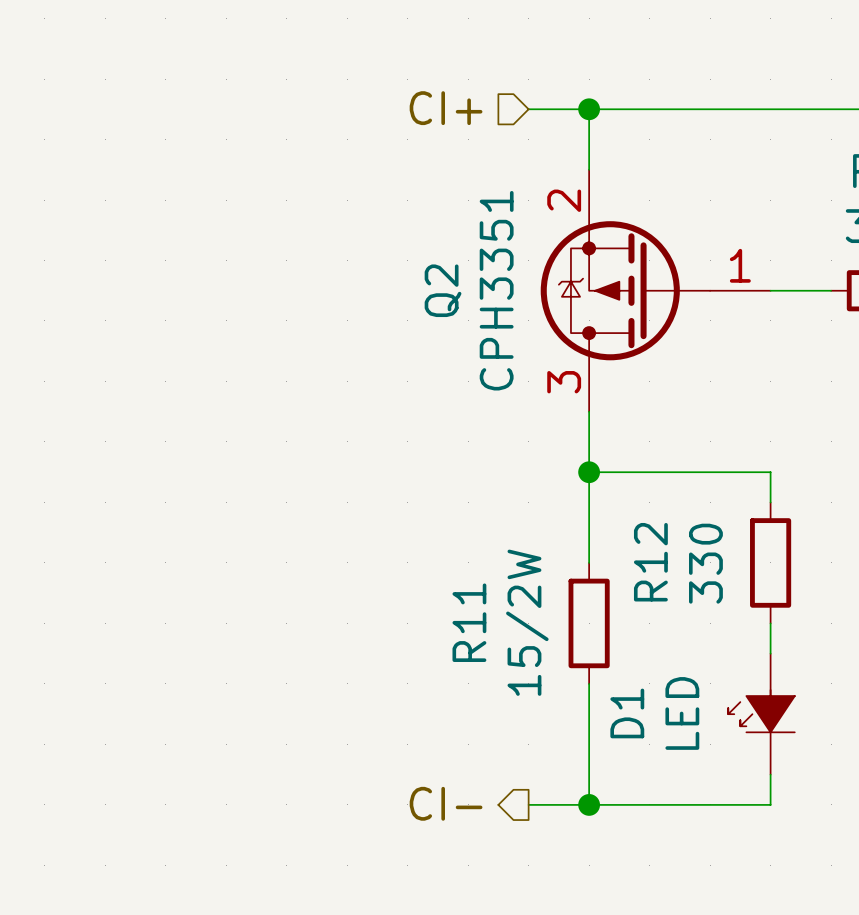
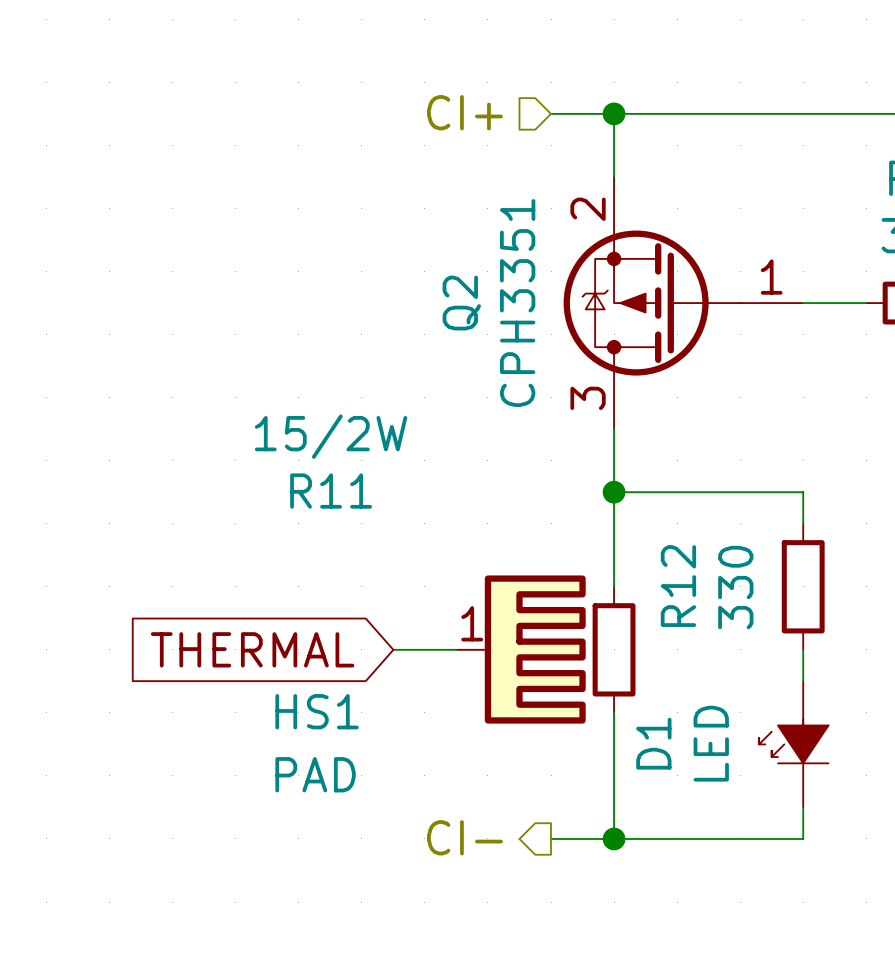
R11 name rotation: 0° (469, 622) -> 90° clockwise (331, 491)
R11 name position: R11 (469, 622) -> R11 (331, 491)
R11 value rotation: 0° (527, 622) -> 90° clockwise (331, 436)
R11 value position: 15/2W (527, 622) -> 15/2W (331, 436)
global label: none -> THERMAL (252, 649)
wire: none -> (393, 649) (456, 649)
HS1: none -> PAD (521, 649)

